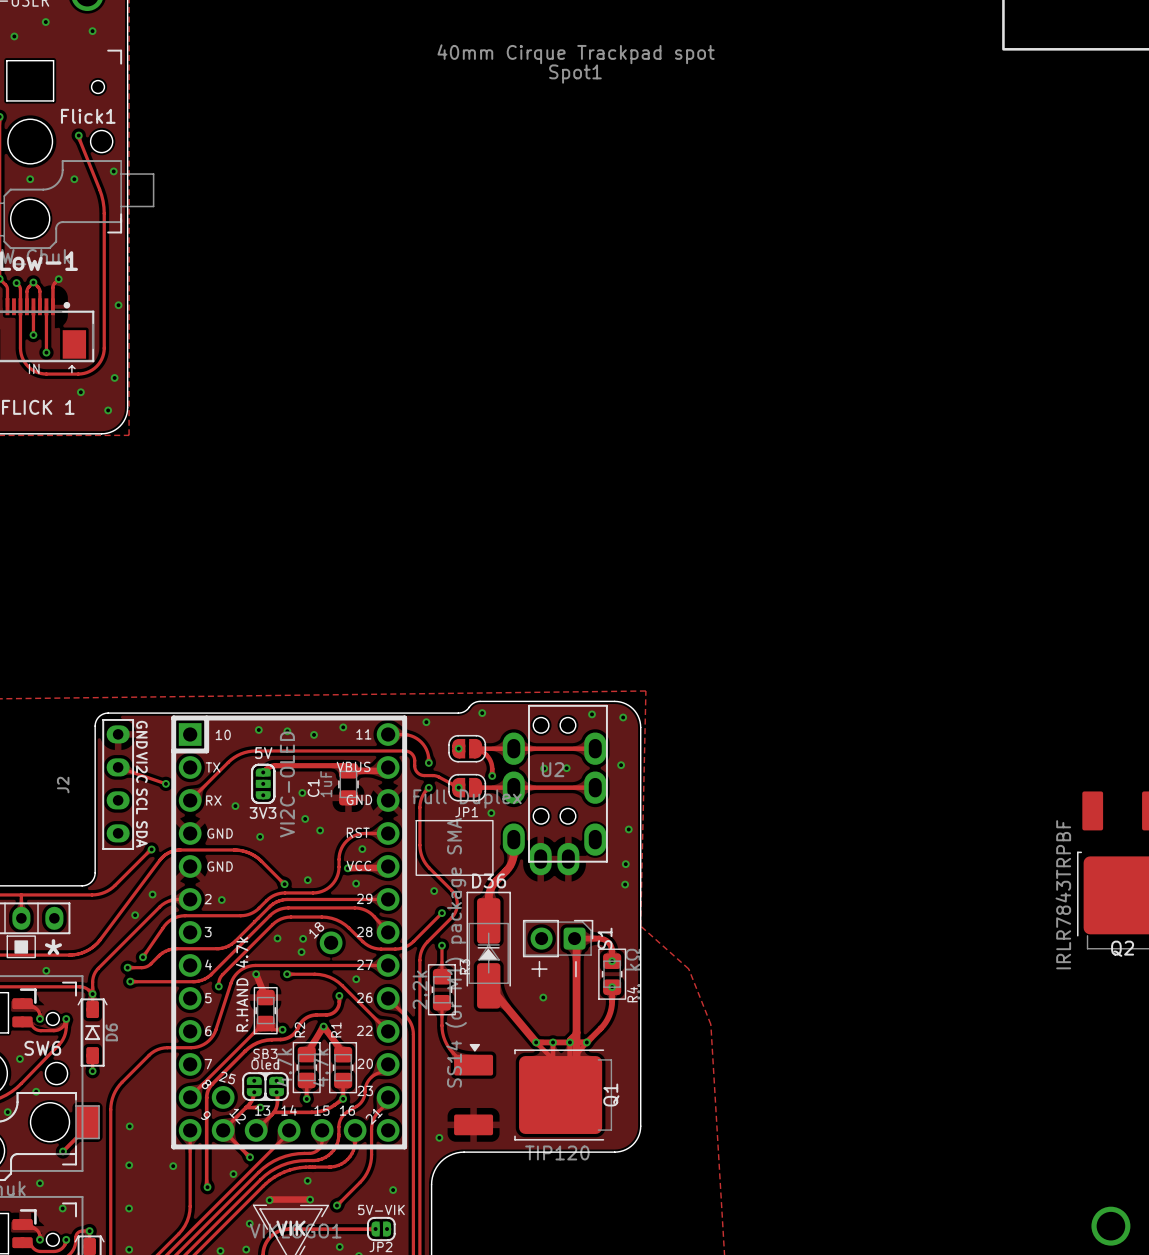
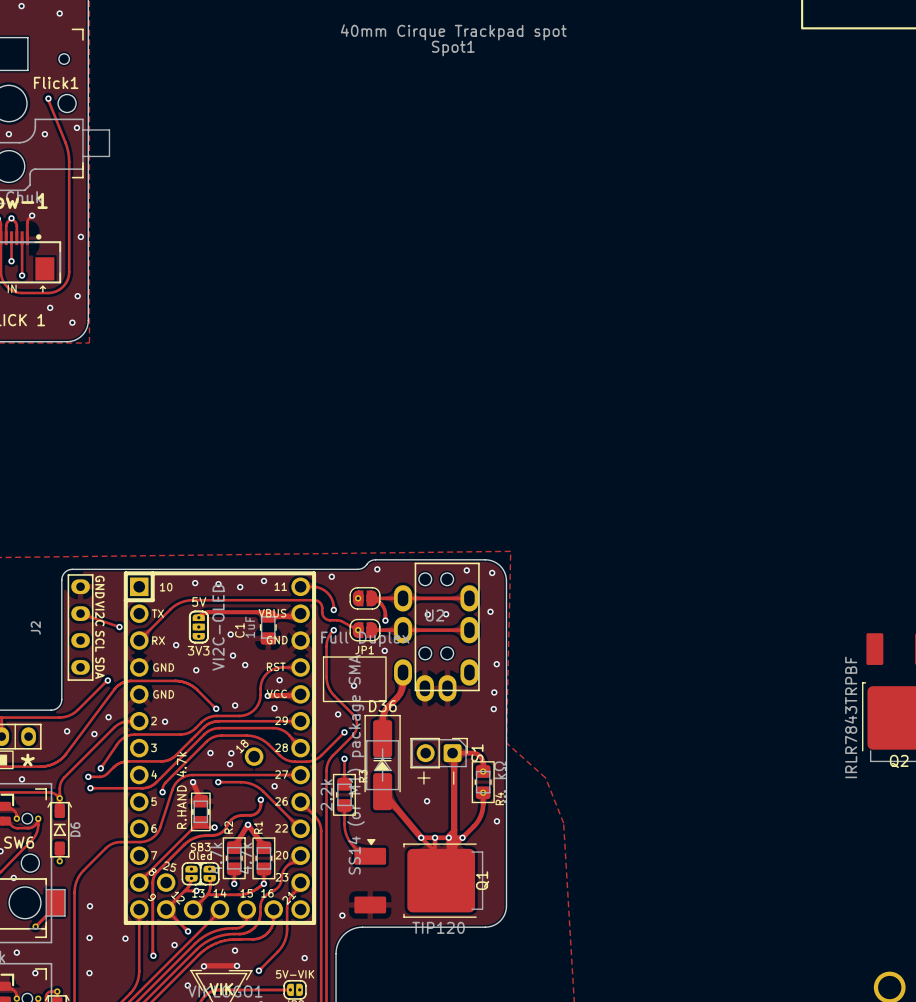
via: none -> (354, 685)
via: none -> (67, 731)
via: none -> (496, 821)

